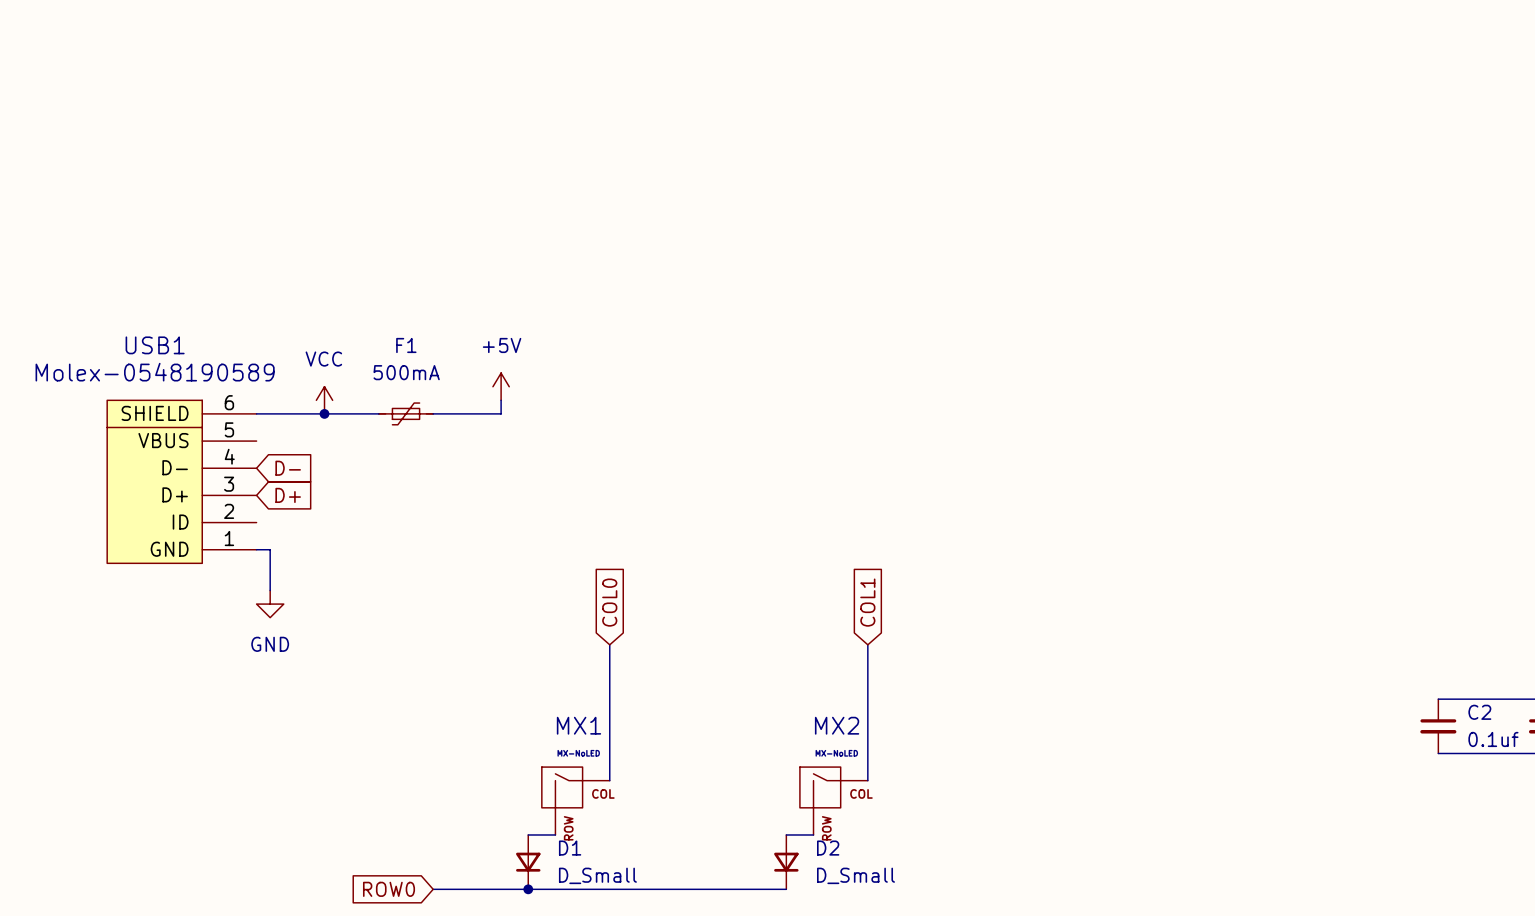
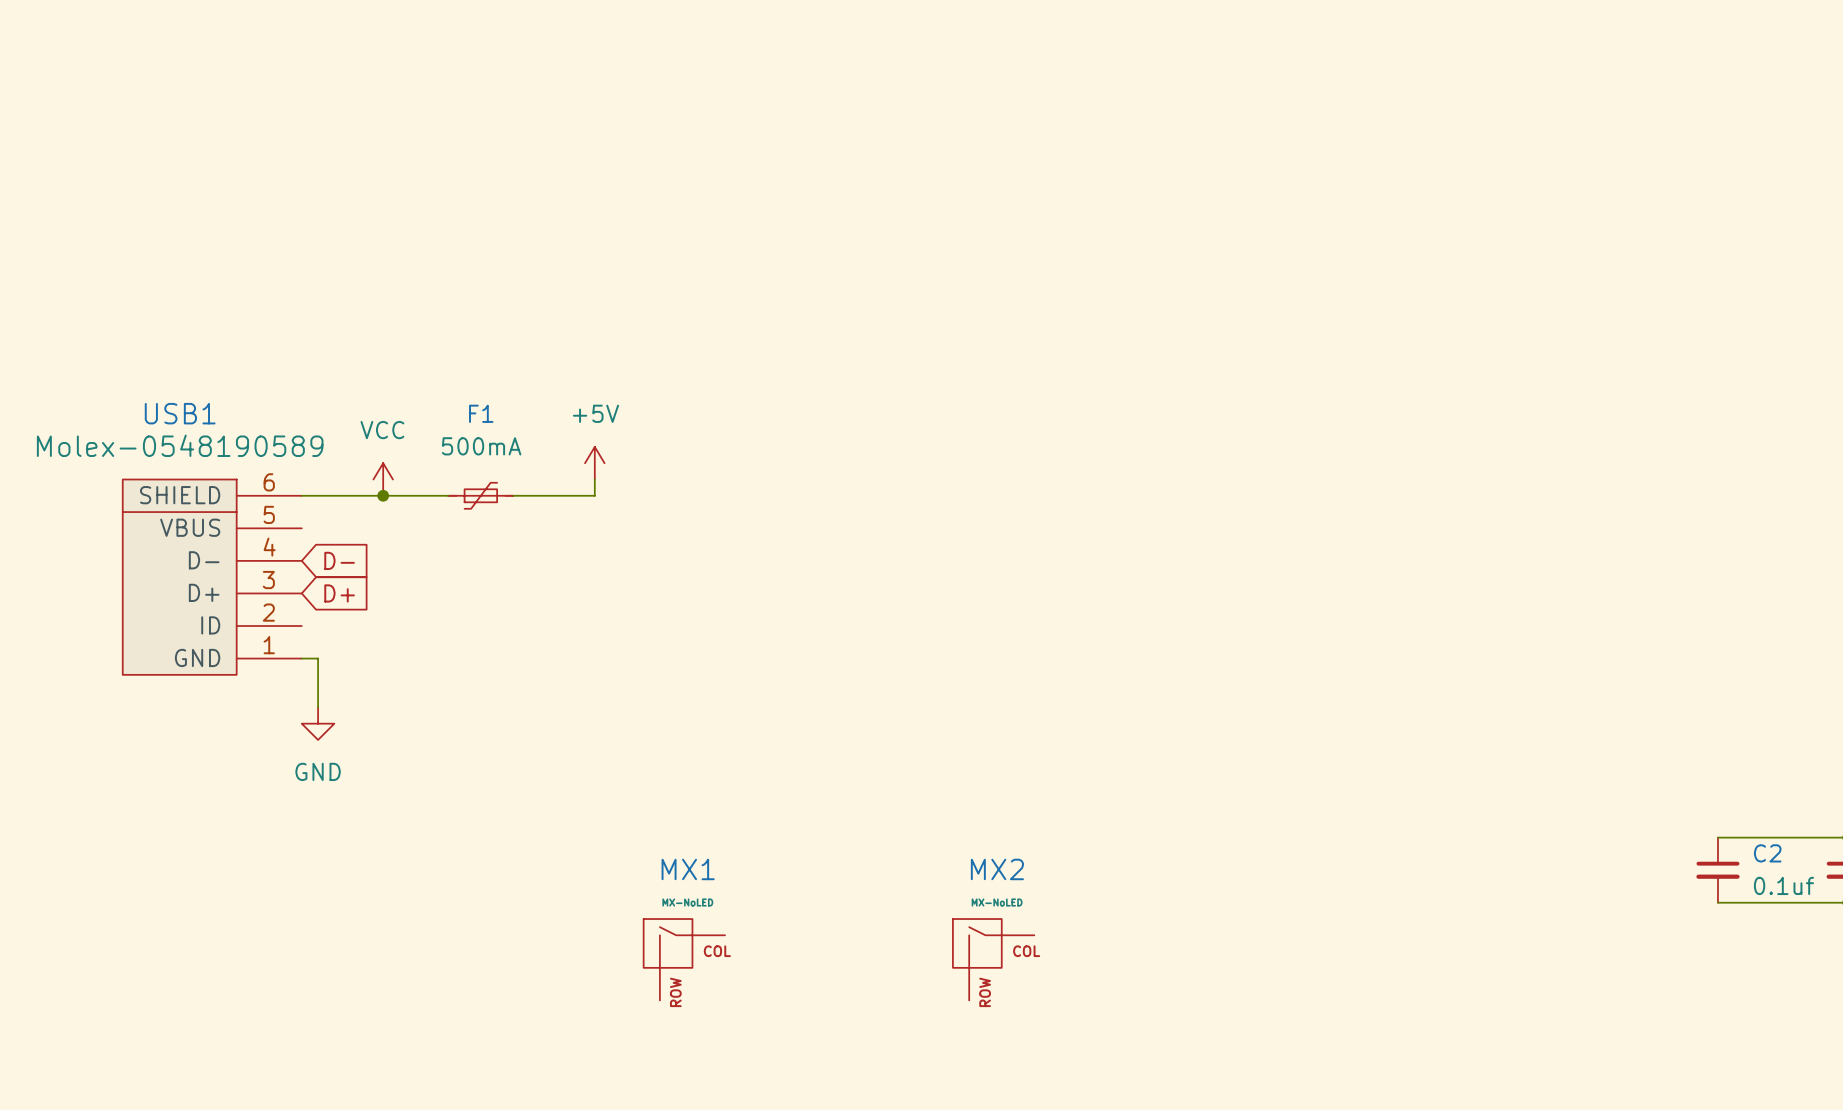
global label: COL0 (609, 602) -> none
global label: COL1 (867, 602) -> none
wire: (609, 644) (609, 780) -> none
wire: (867, 644) (867, 780) -> none
wire: (528, 834) (555, 834) -> none
wire: (786, 834) (813, 834) -> none
D1: D_Small (528, 862) -> none
D2: D_Small (786, 862) -> none
global label: ROW0 (389, 889) -> none
wire: (433, 889) (786, 889) -> none
junction: (528, 889) -> none

